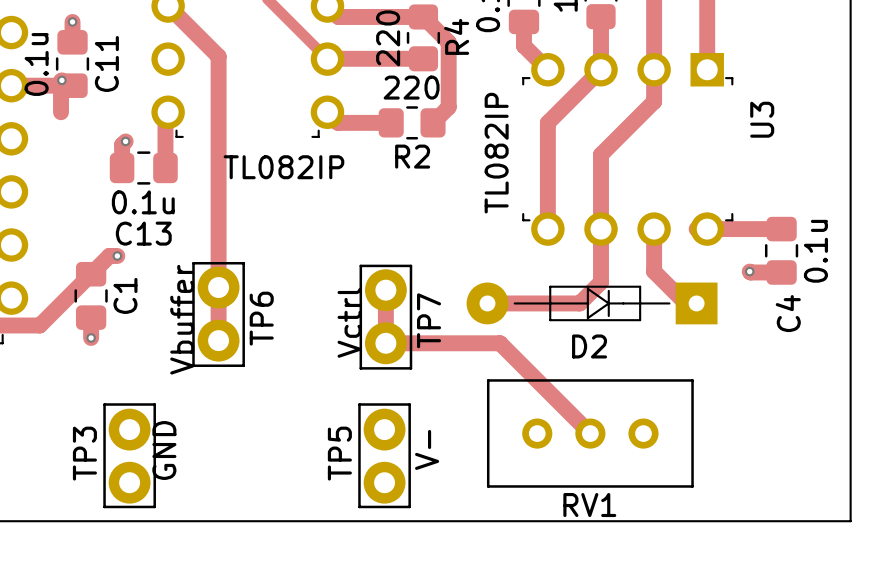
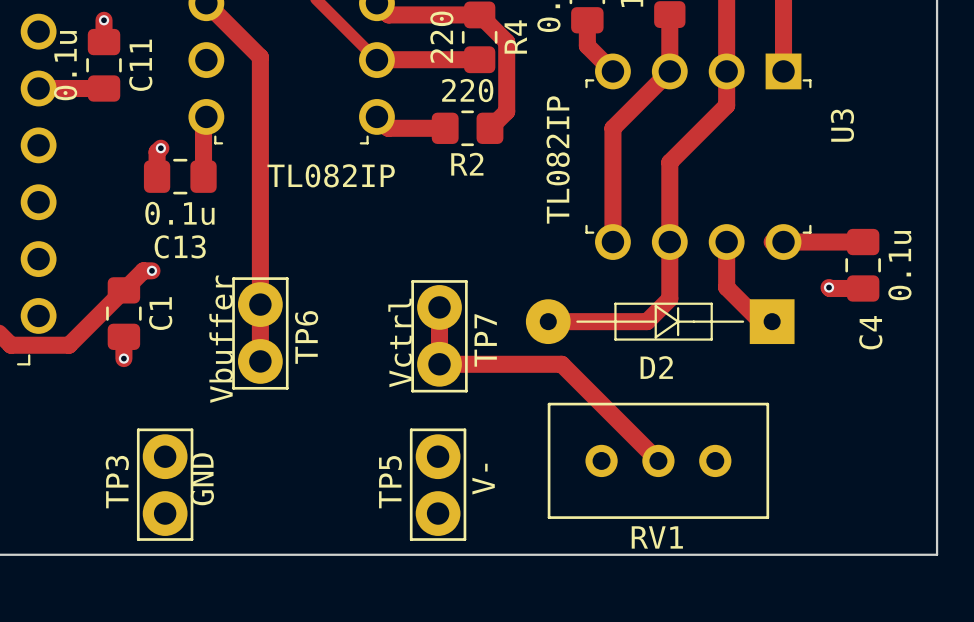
track: (61, 80) (61, 112) -> none
via: (61, 80) -> none

